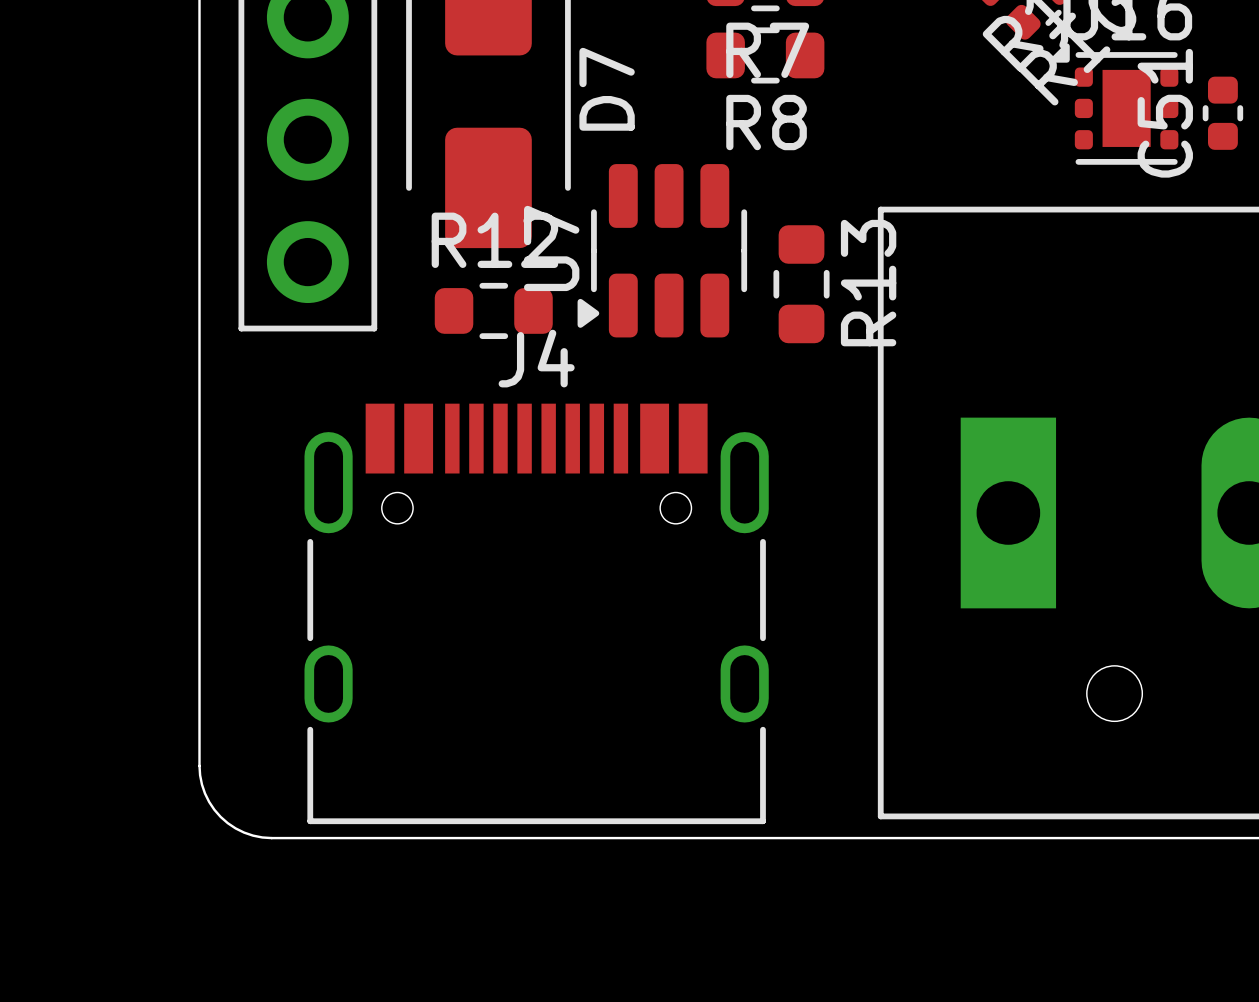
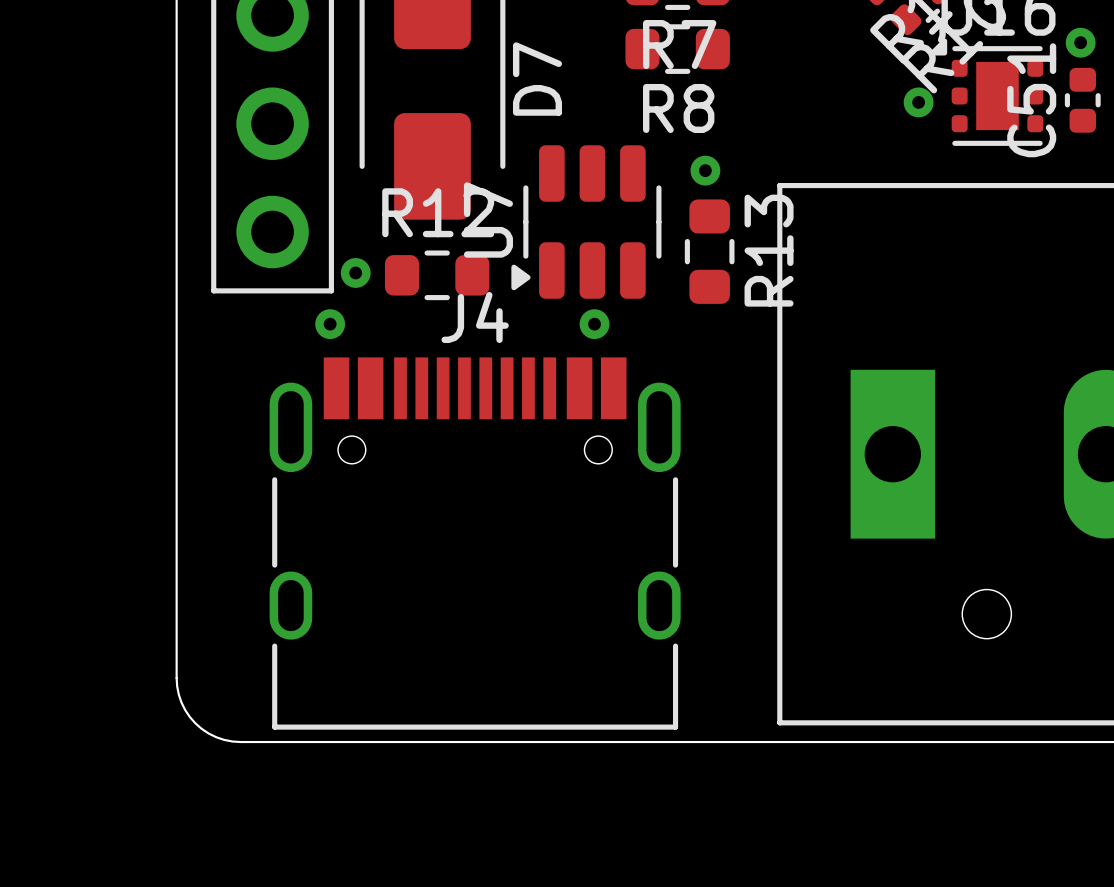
via: none -> (1080, 42)
via: none -> (918, 102)
via: none -> (705, 170)
via: none -> (355, 272)
via: none -> (330, 324)
via: none -> (594, 324)

